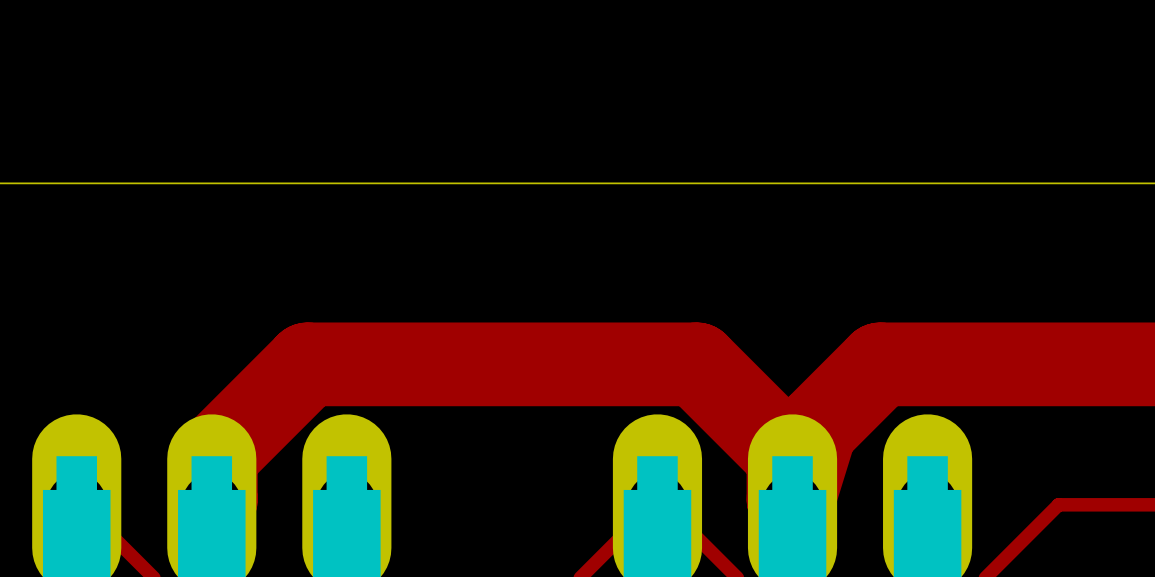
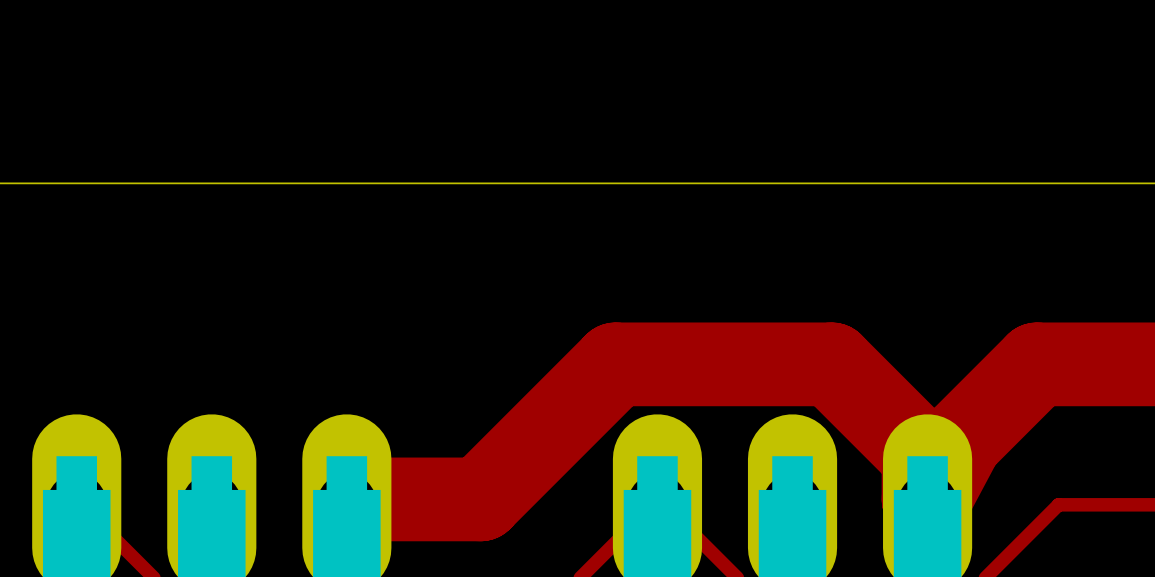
track: (615, 364) (307, 364) (215, 456) (215, 499) (211, 503) -> (615, 364) (480, 499) (350, 499) (346, 503)
track: (696, 364) (788, 456) (788, 499) (792, 503) (815, 429) (880, 364) (1036, 364) -> (696, 364) (831, 364) (923, 456) (923, 499) (927, 503) (961, 439) (1036, 364)

